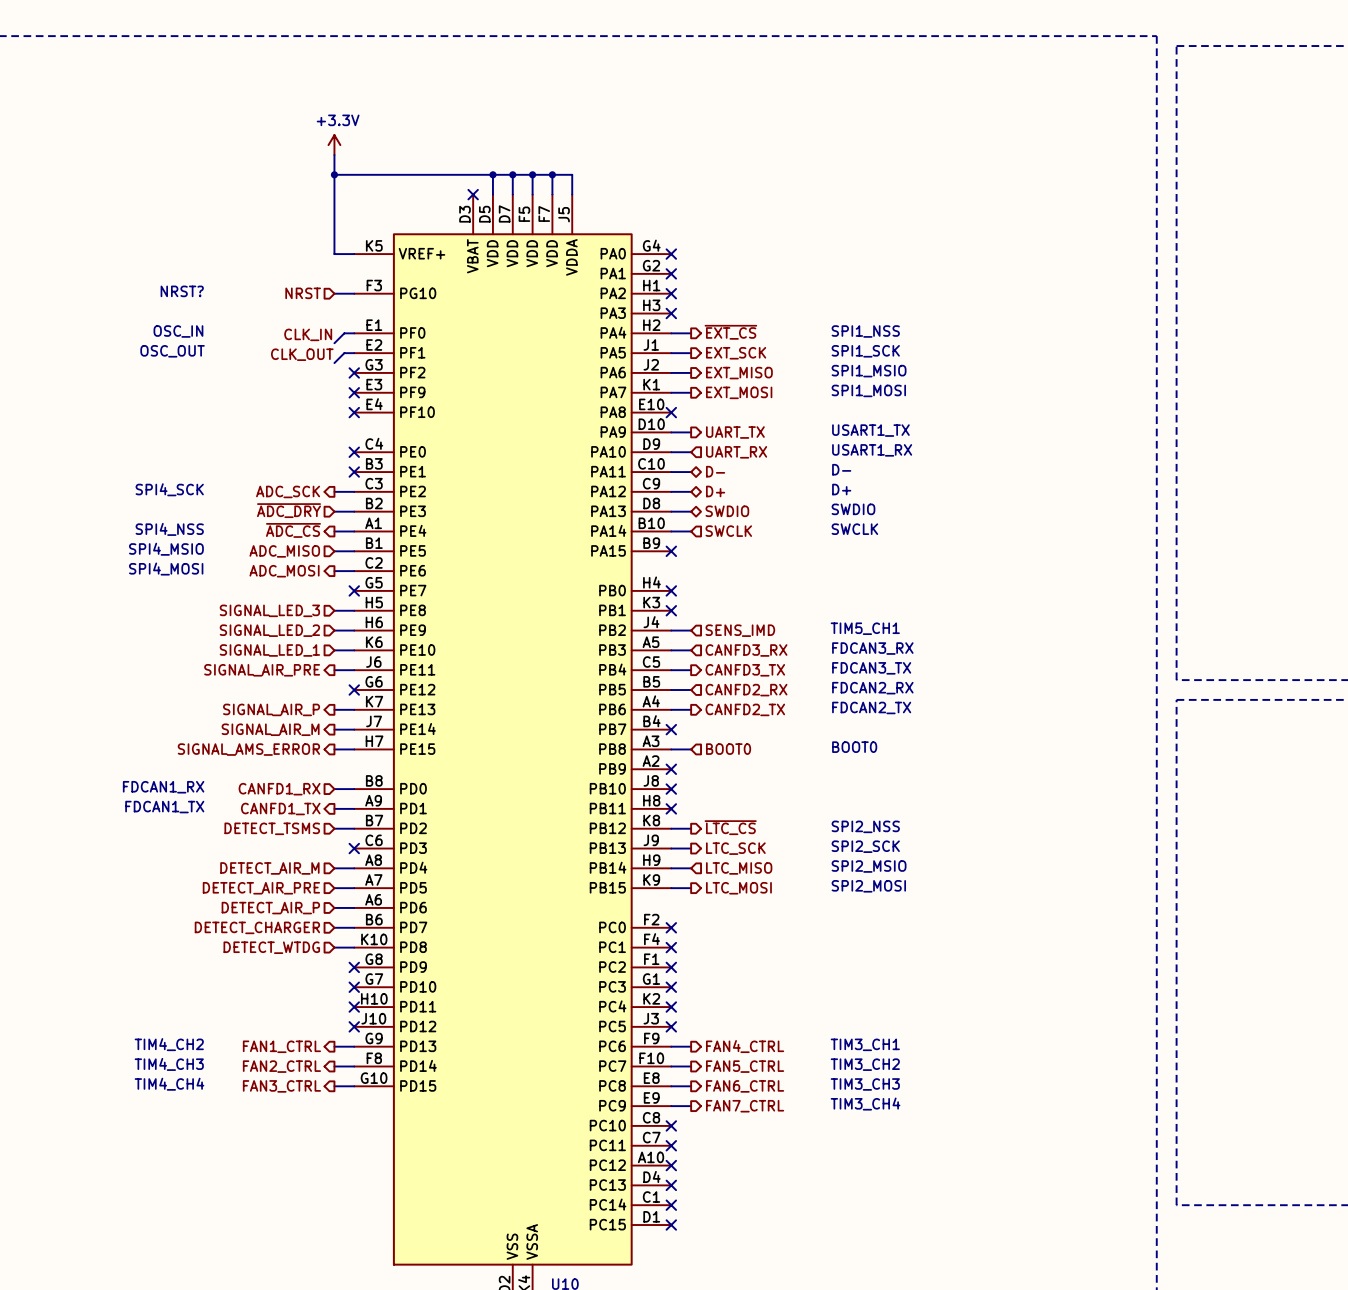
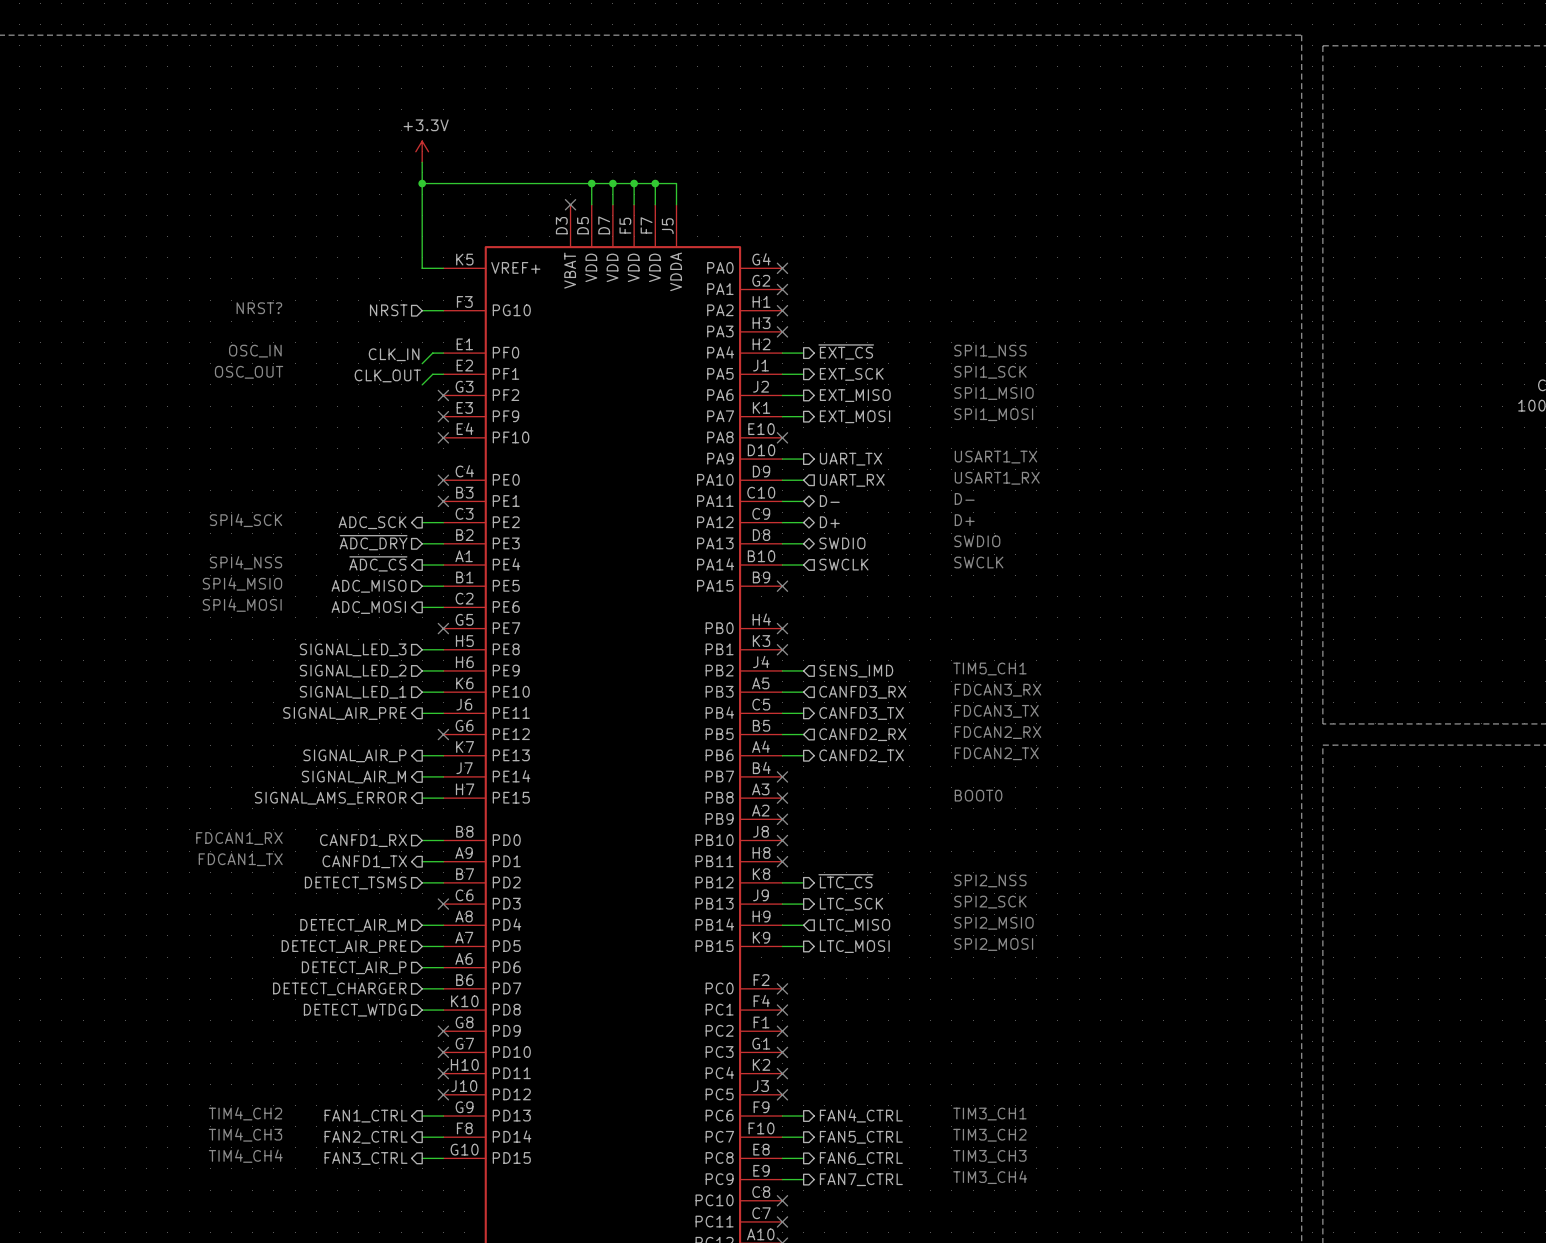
wire: (671, 749) (691, 749) -> none
no-connect mark: none -> (782, 798)
hierarchical label: BOOT0 (728, 749) -> none

